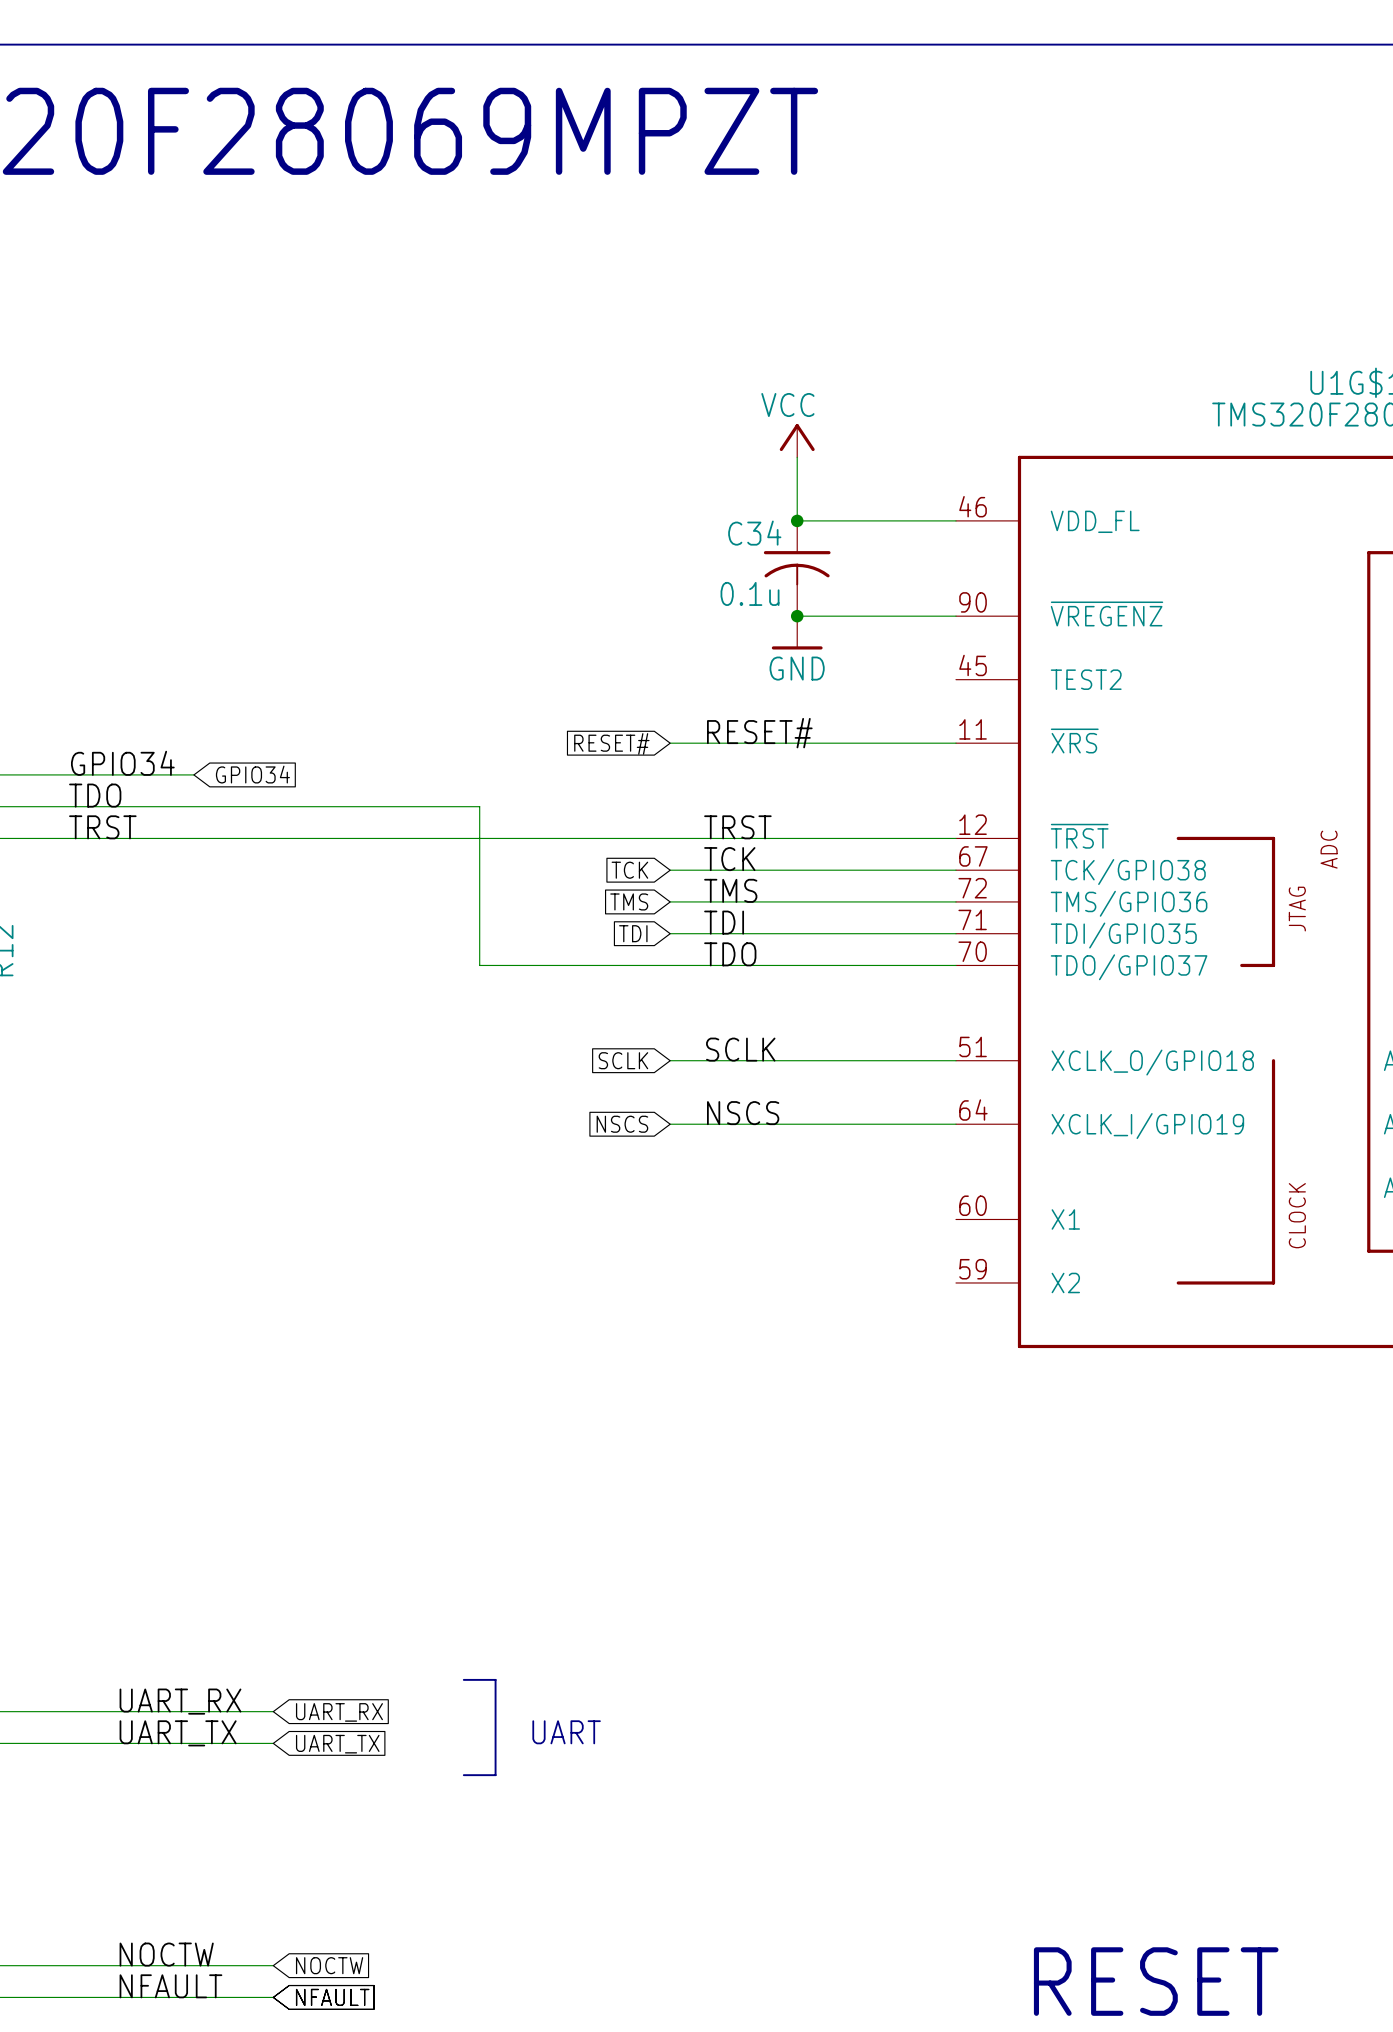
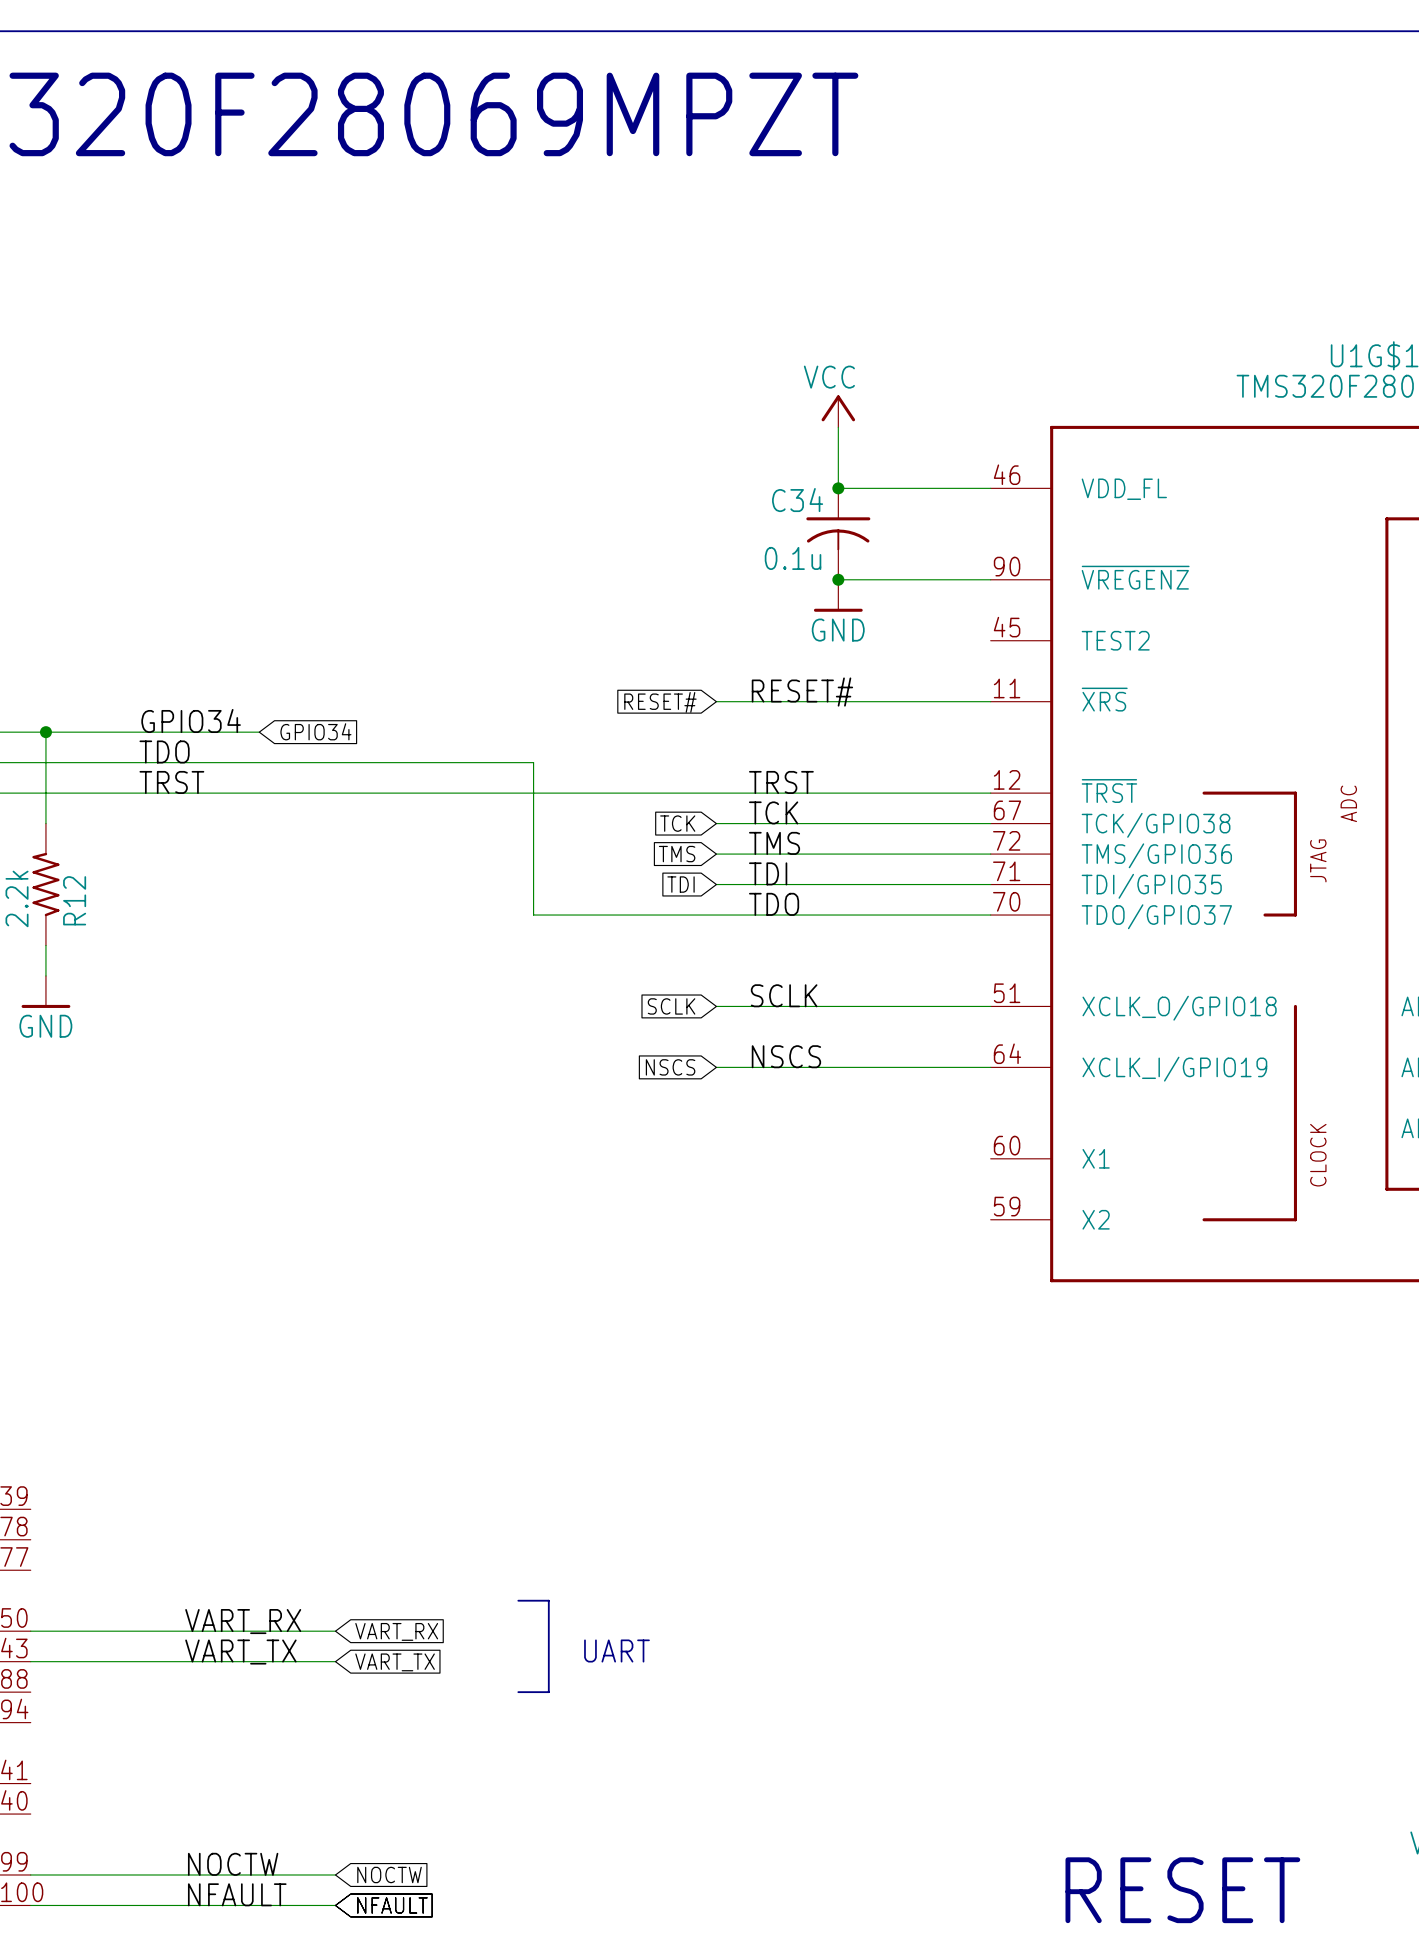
label: UART_RX (180, 1701) -> VART_RX (243, 1621)
global label: UART_RX (339, 1712) -> VART_RX (396, 1631)
label: UART_TX (178, 1733) -> VART_TX (240, 1652)
global label: UART_TX (337, 1744) -> VART_TX (395, 1662)

